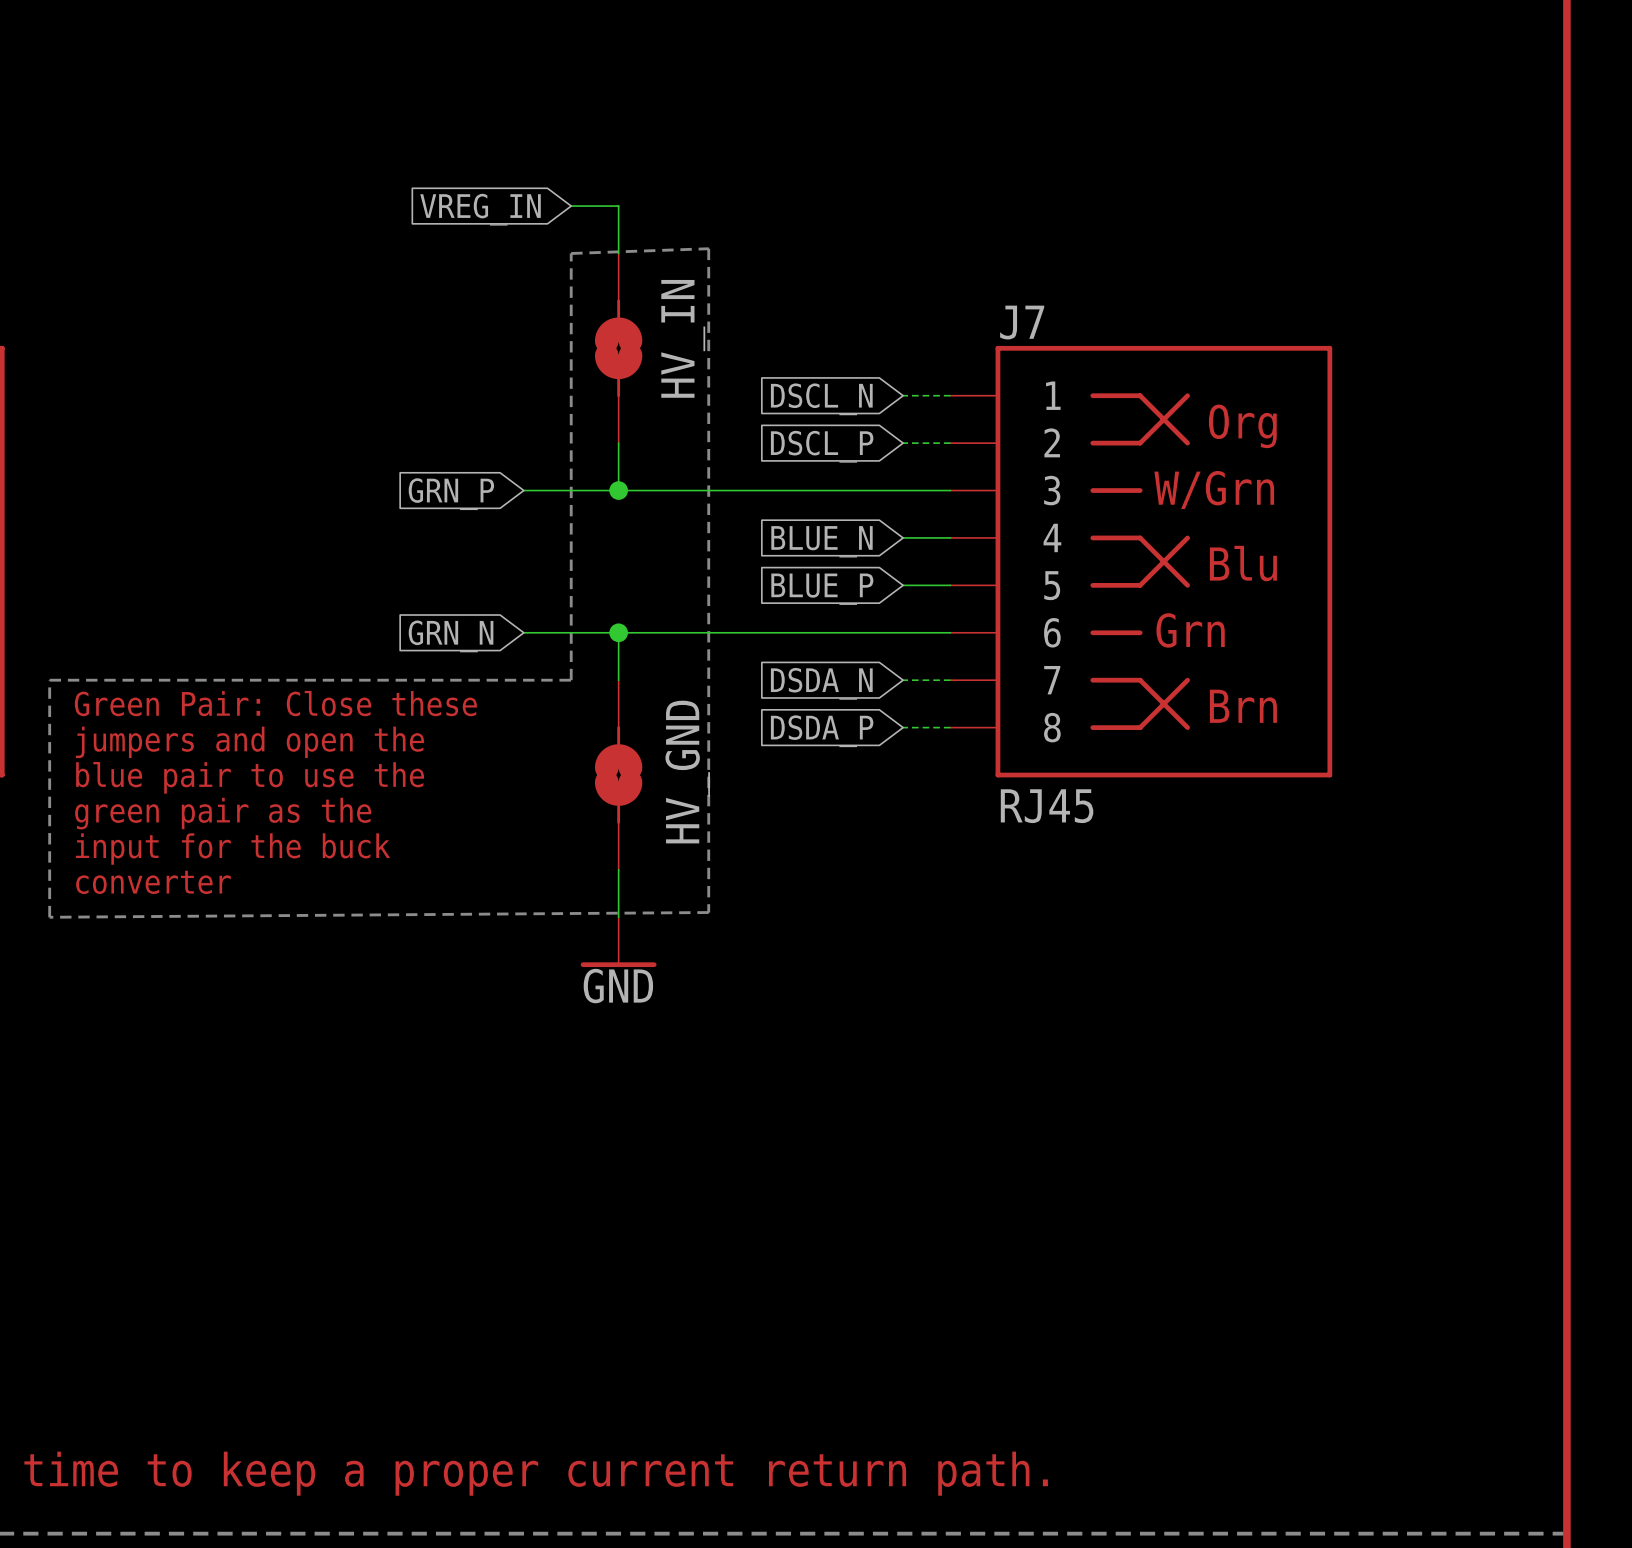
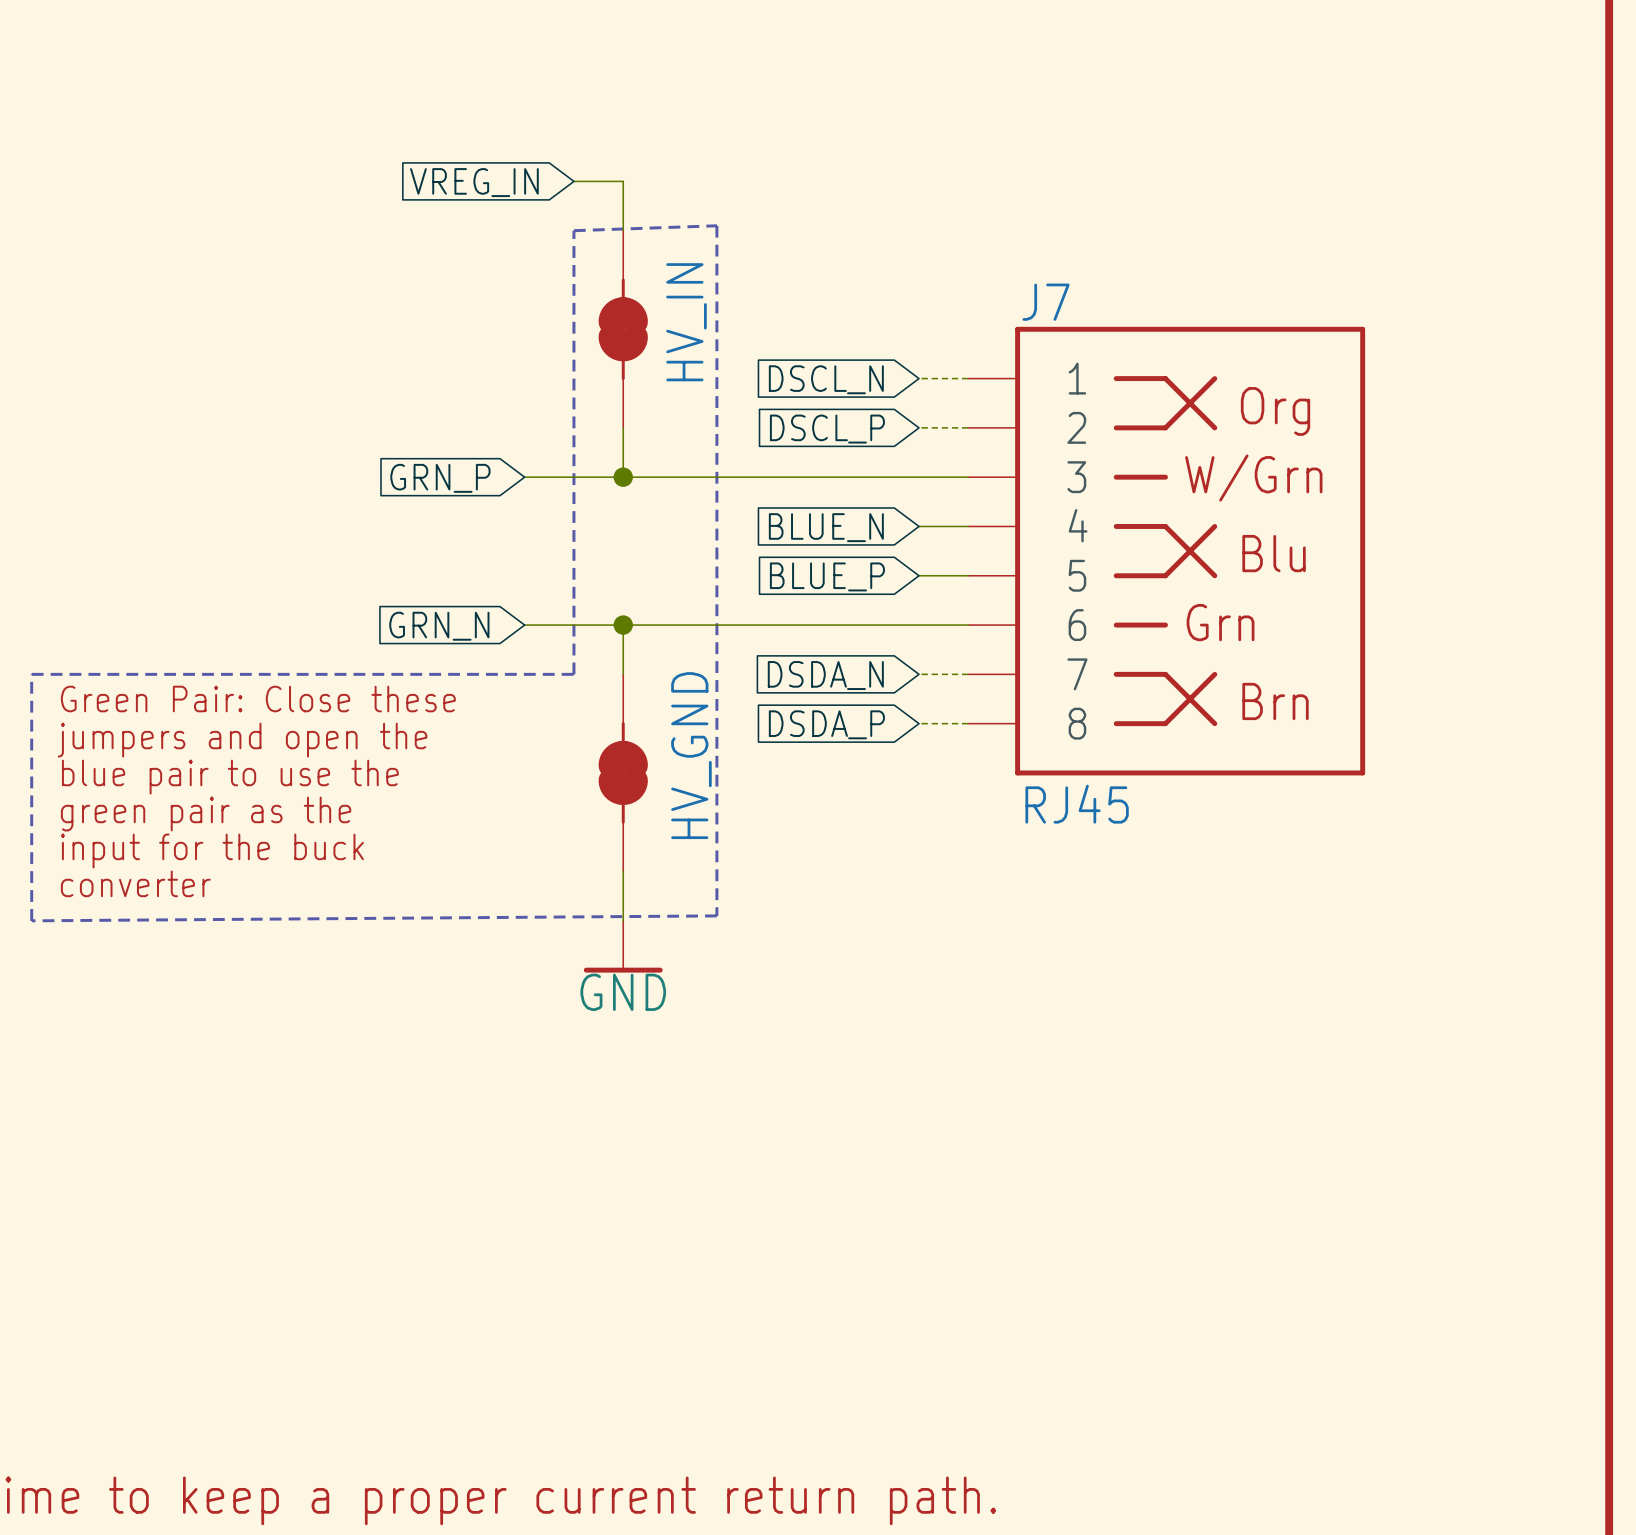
HV_IN symbol: [594, 253, 643, 444] -> [598, 230, 648, 428]
HV_GND symbol: [594, 680, 643, 870] -> [598, 674, 648, 872]

